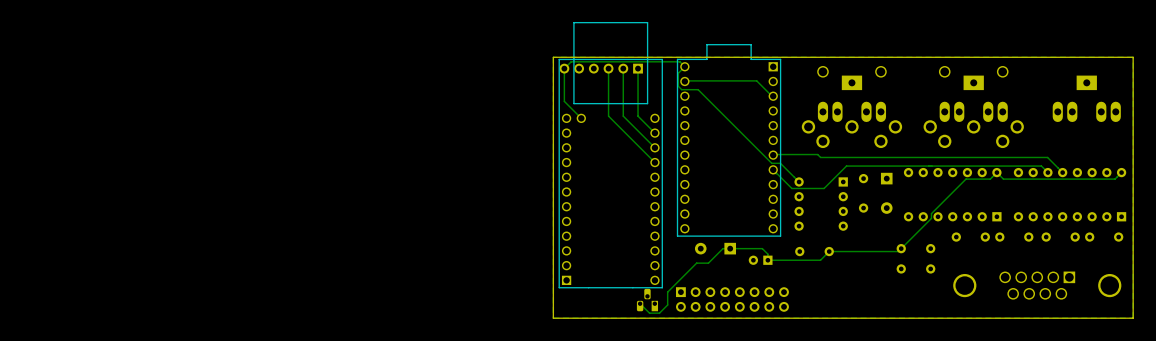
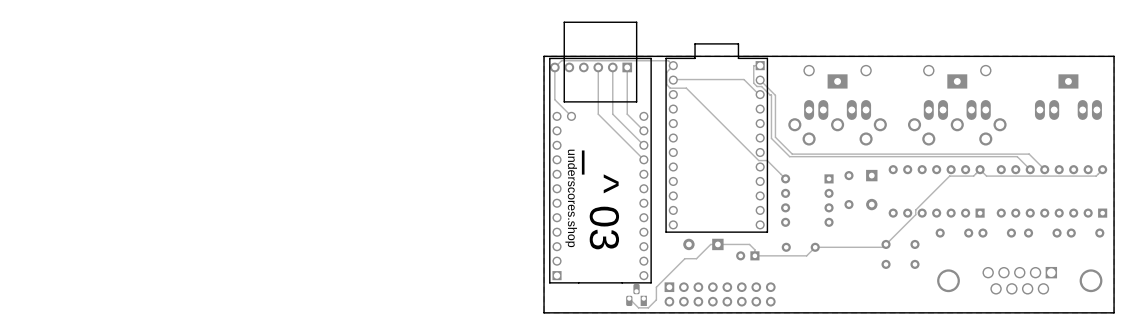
track: (771, 154) (817, 154) (820, 157) (1047, 157) -> (760, 80) (775, 95) (775, 137) (792, 154) (1029, 154)
track: (1041, 166) (846, 166) (824, 188) (791, 188) (773, 169) -> (1023, 163) (1017, 156) (789, 156) (771, 138) (771, 95) (761, 86) (757, 86) (753, 83) (753, 66) (760, 65)
text: none -> underscores.shop (571, 198)
text: none -> _^ 03 (600, 199)

